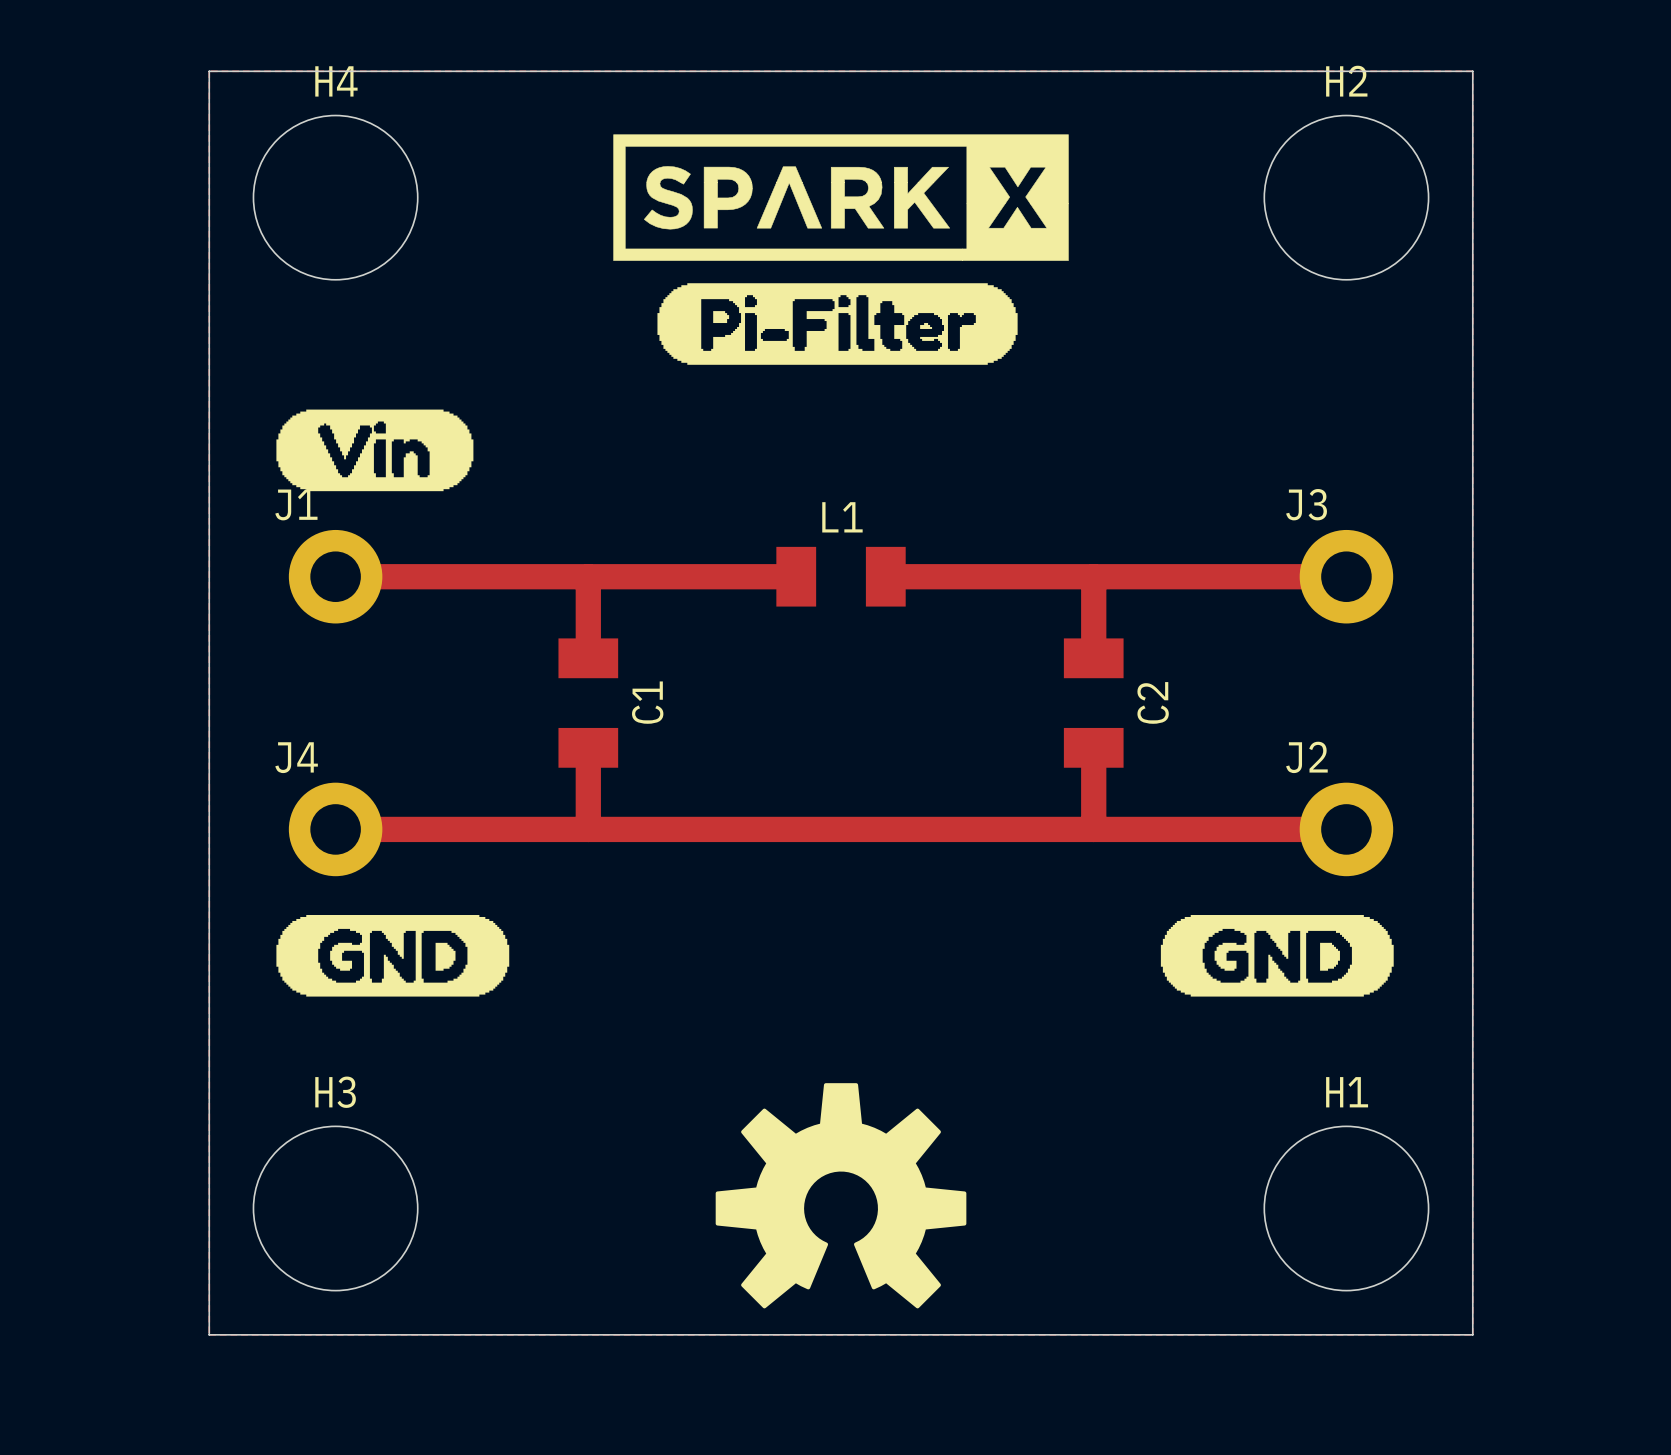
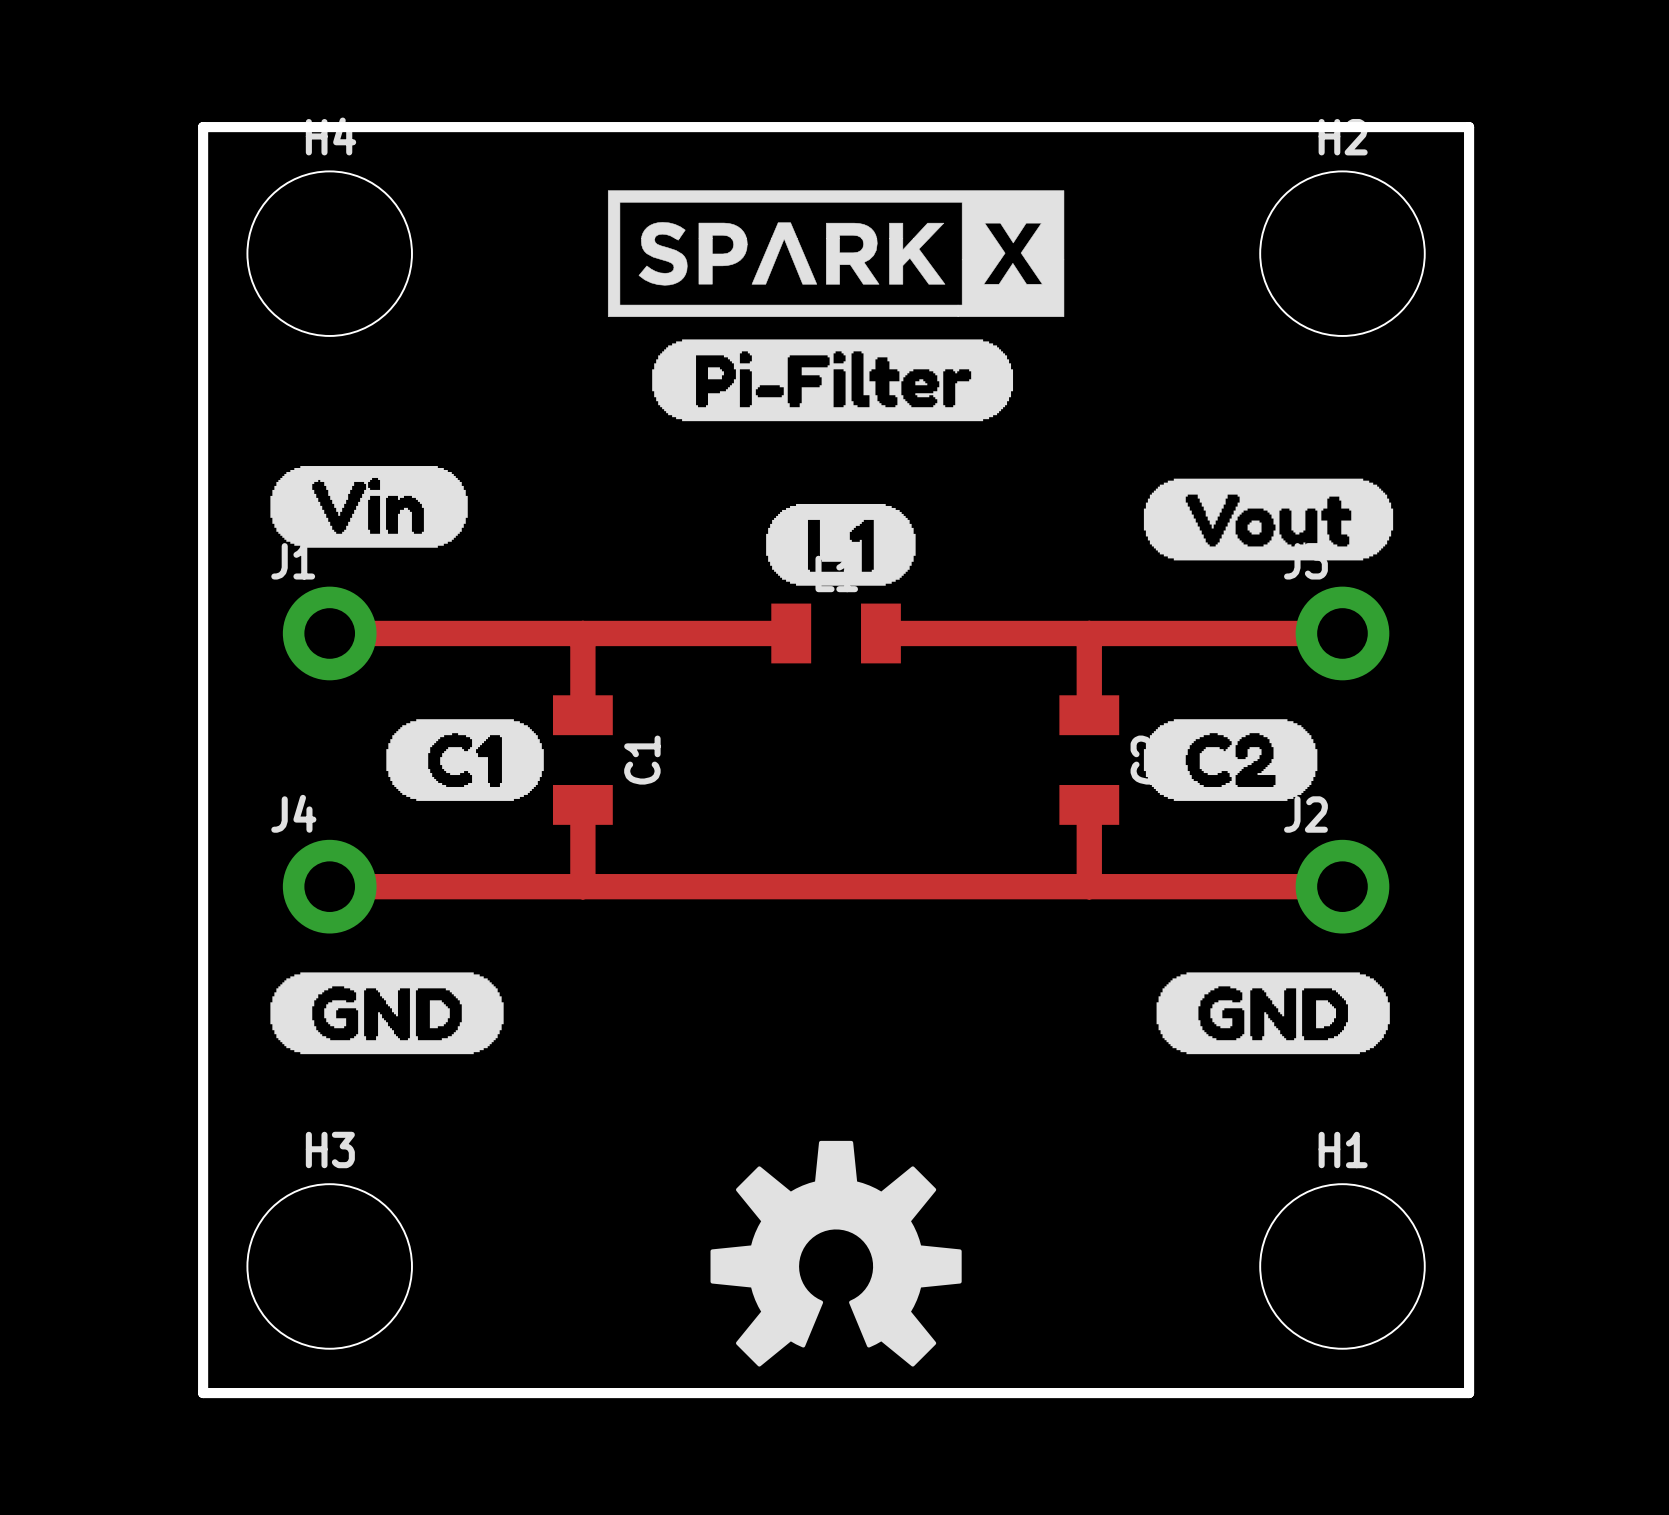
board edge width: thin (209, 71) (1472, 71) (1472, 1334) (209, 1334) (209, 71) -> thick (203, 127) (1469, 127) (1469, 1393) (203, 1393) (203, 127)
drawing: none -> [1143, 478, 1394, 561]
drawing: none -> [766, 503, 916, 586]
drawing: none -> [386, 719, 544, 801]
drawing: none -> [1143, 719, 1318, 801]

